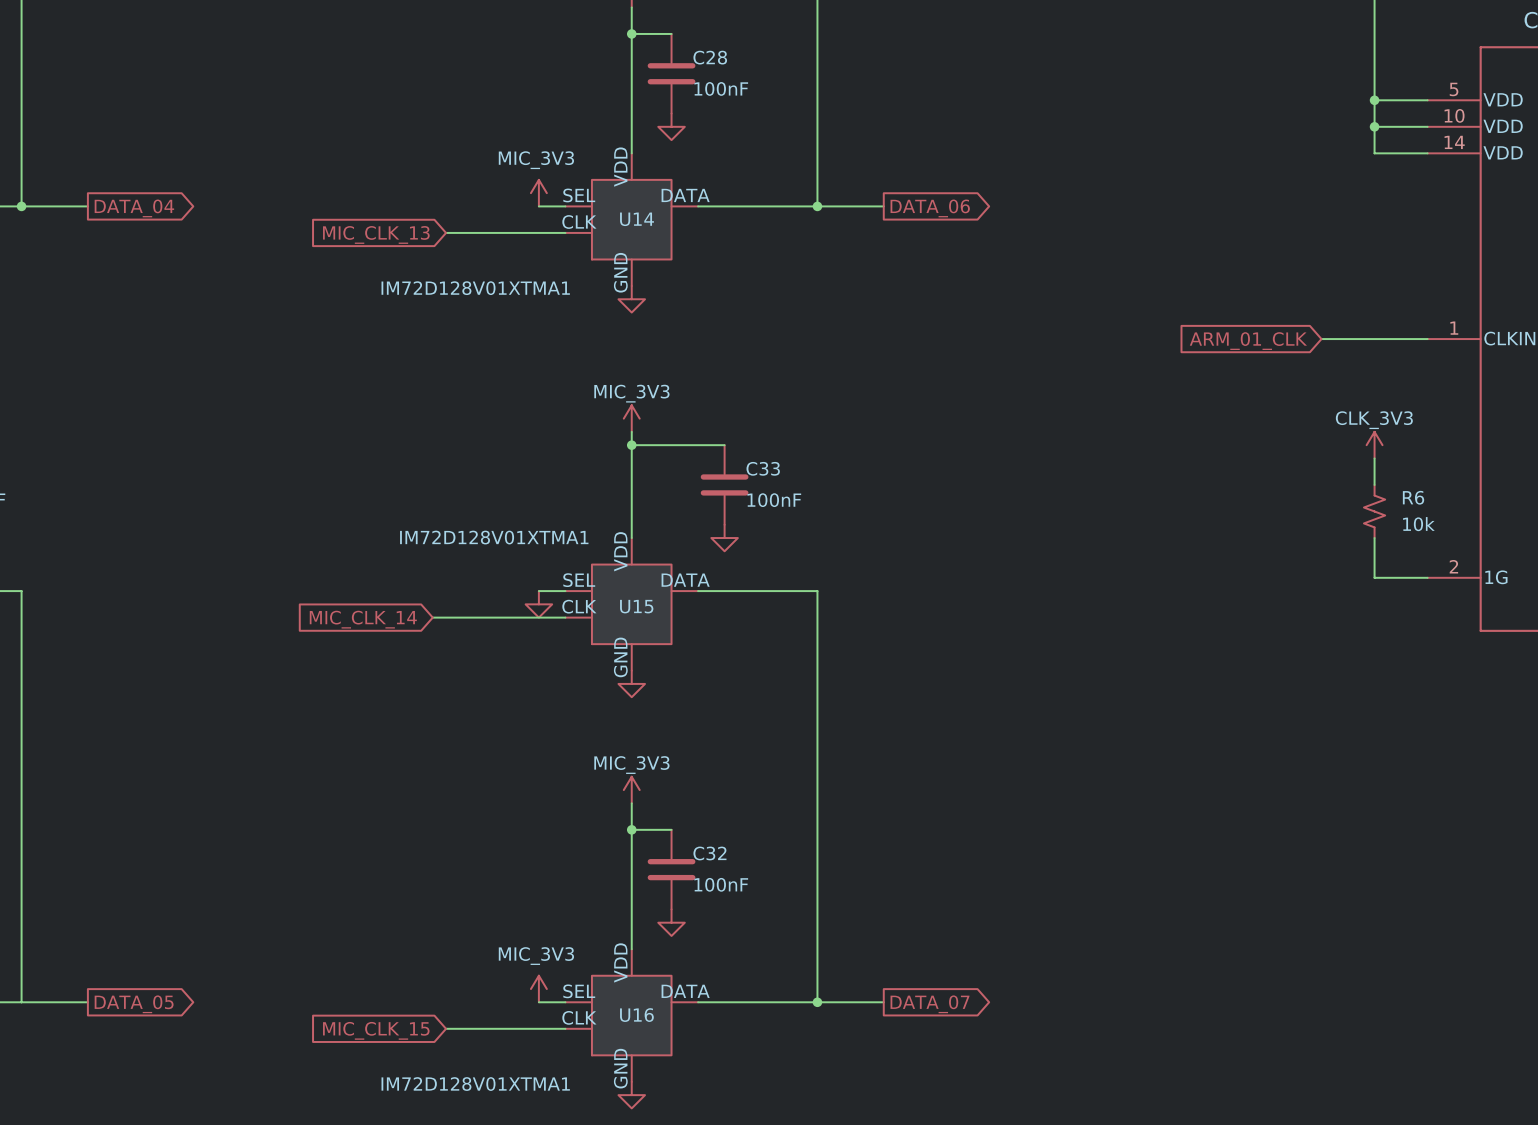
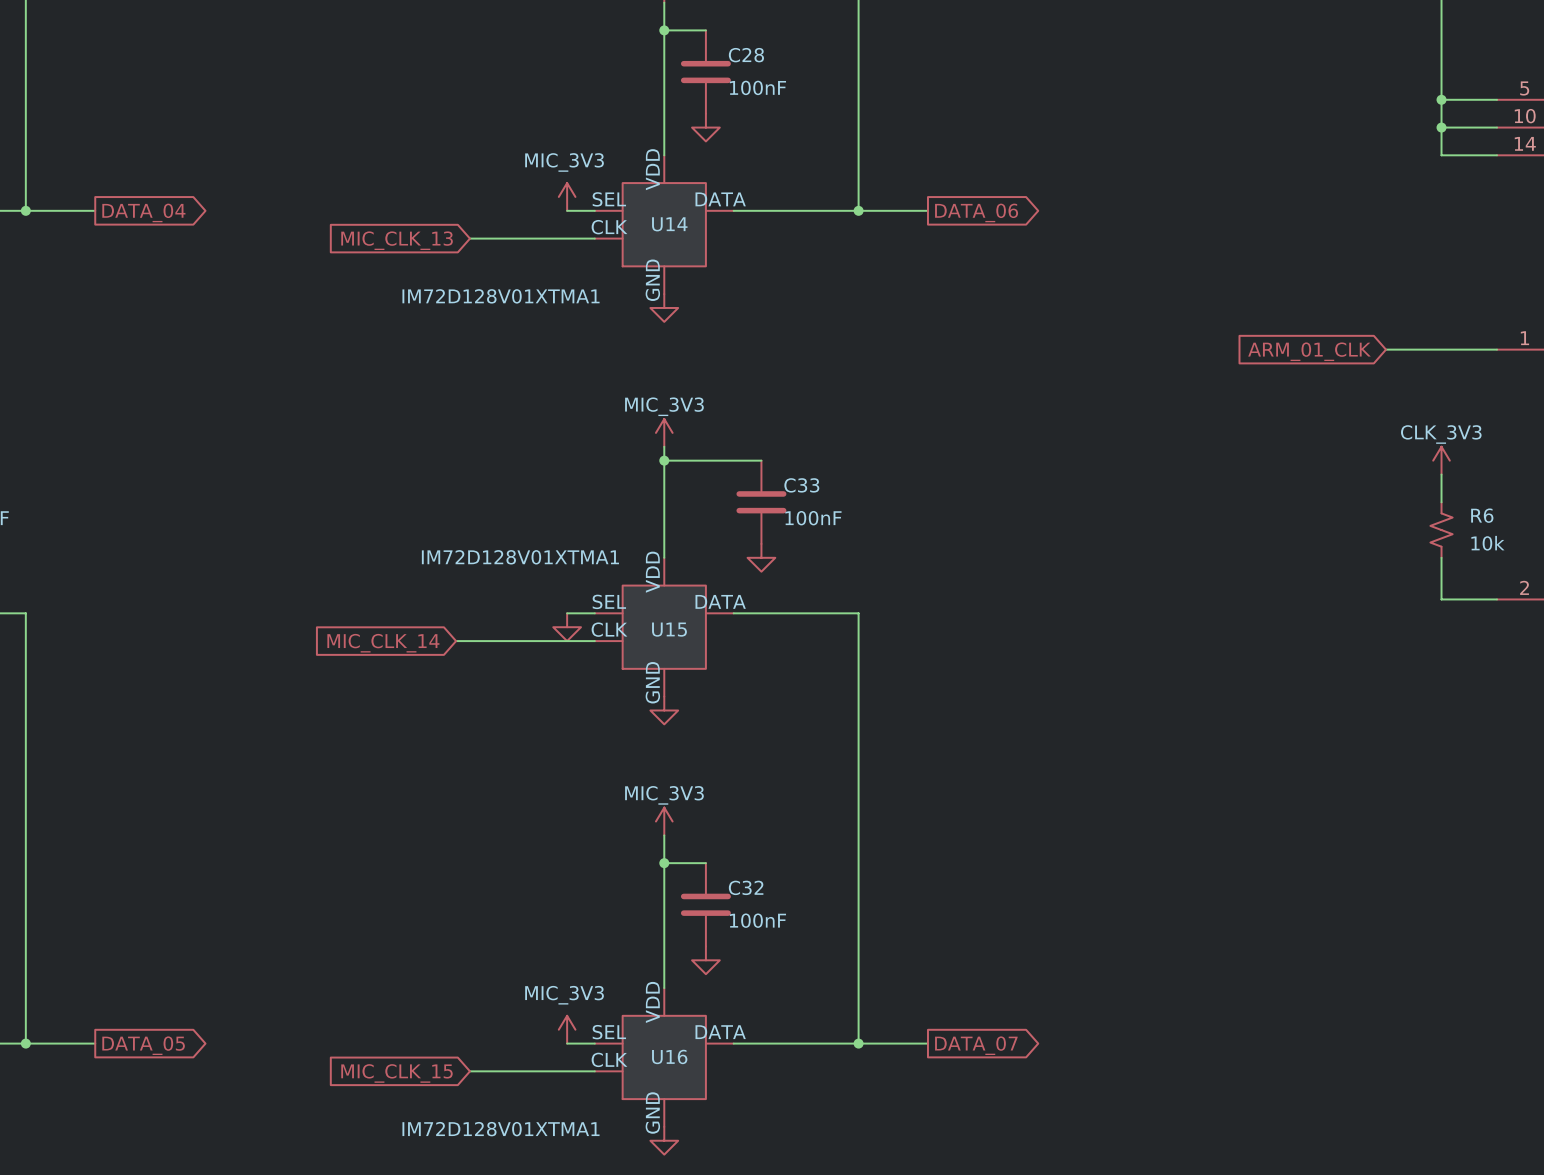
junction: none -> (25, 1043)

